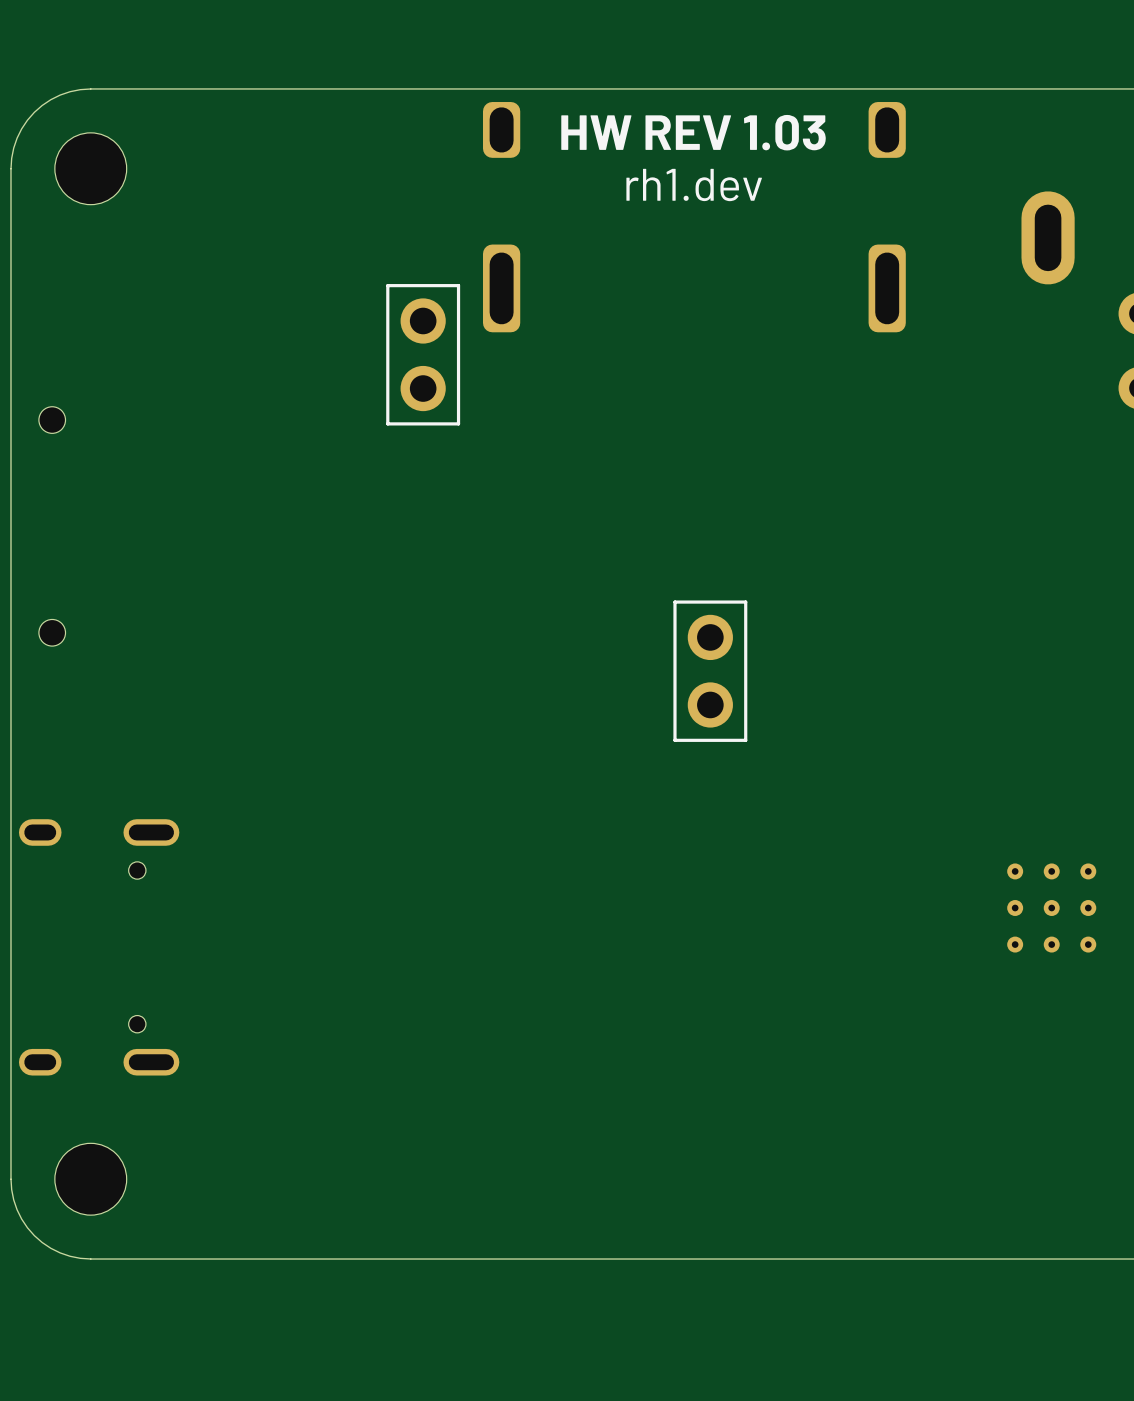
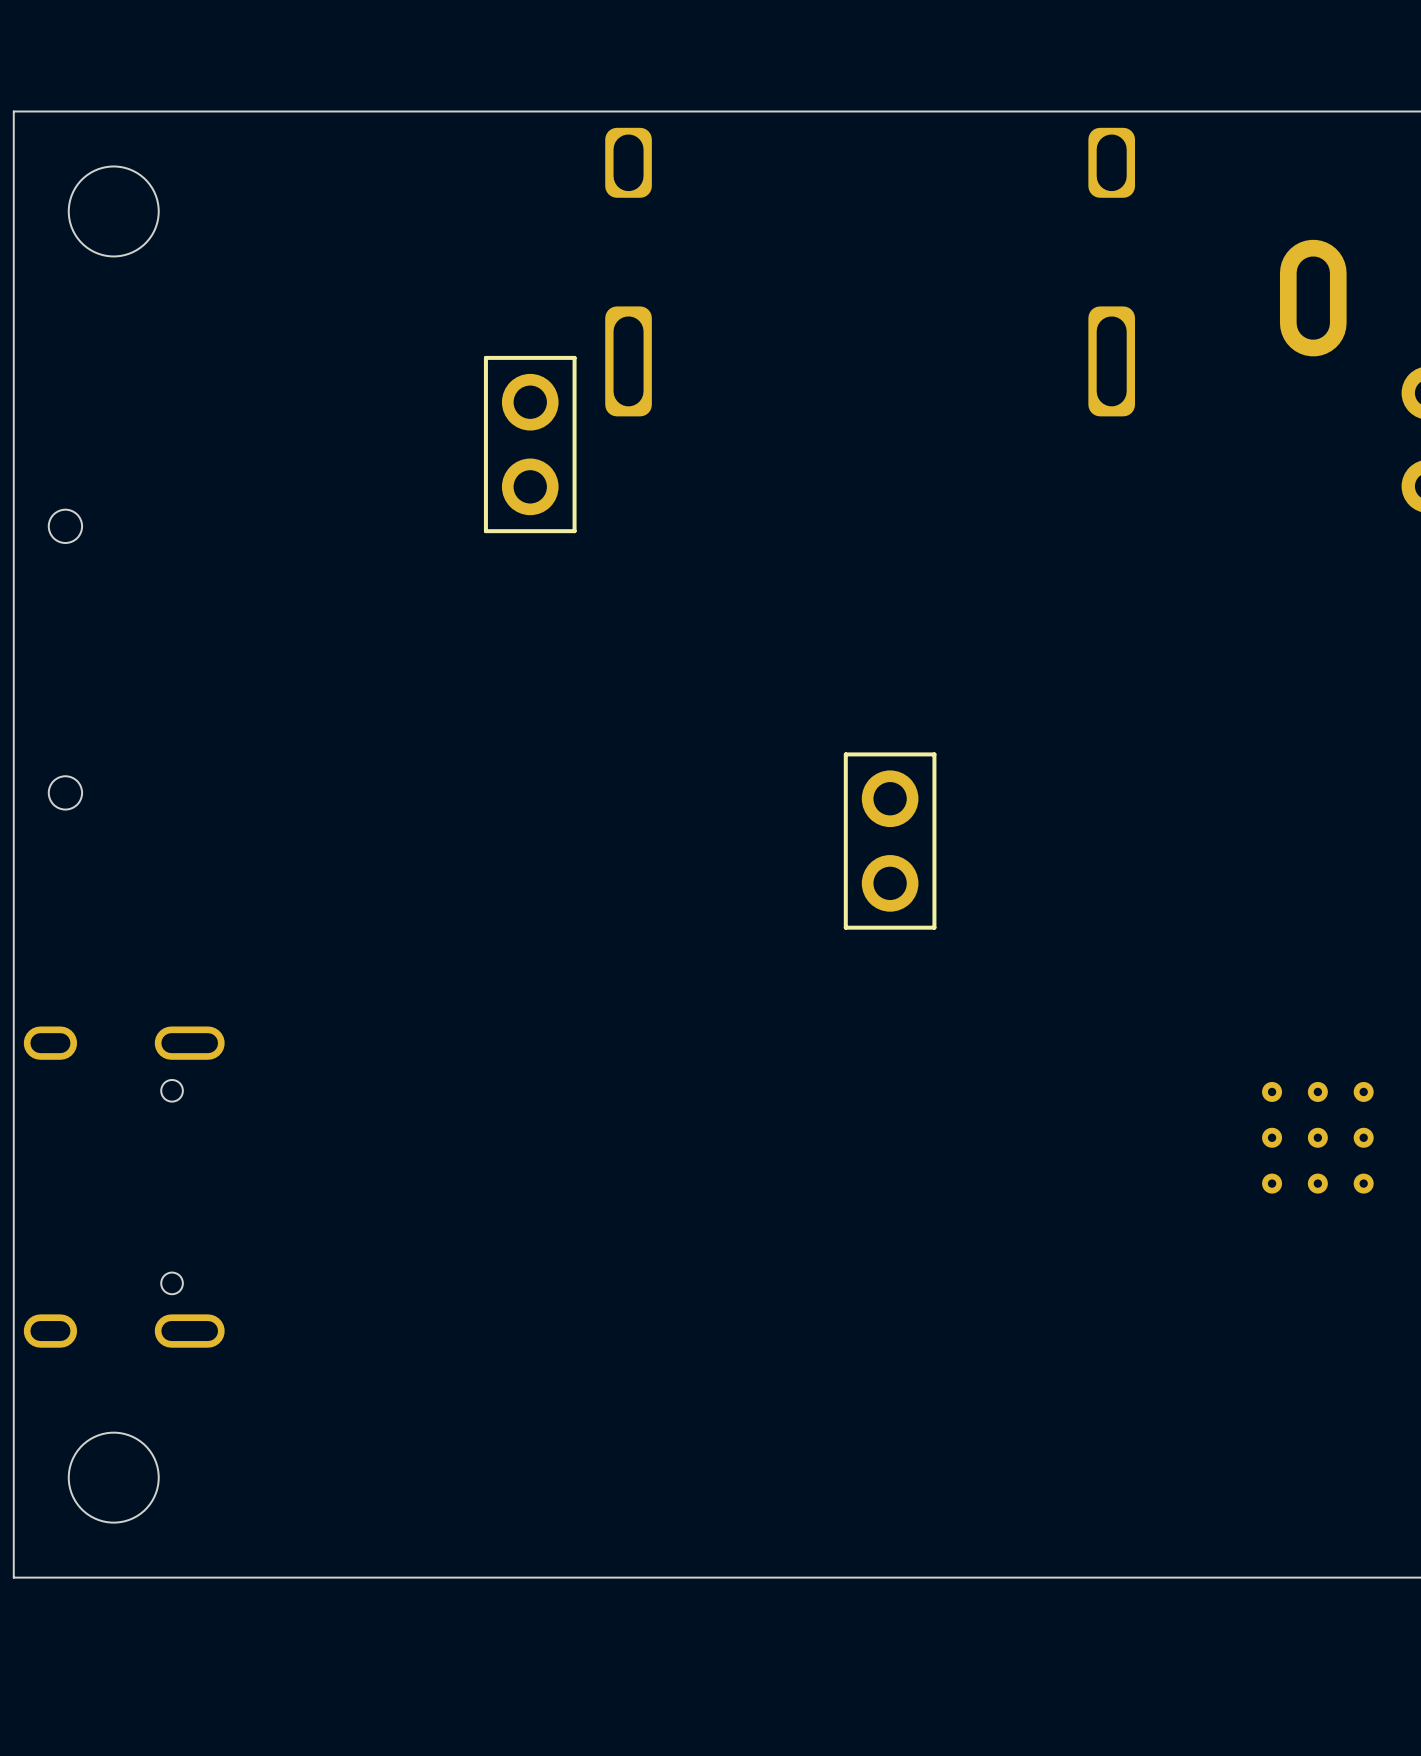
board edge: (90, 88) (60, 95) (34, 112) (17, 138) (10, 168) -> (113, 111) (13, 111) (13, 211)
text: HW REV 1.03 (693, 132) -> none
text: rh1.dev (694, 185) -> none
board edge: (10, 1179) (17, 1209) (34, 1235) (60, 1252) (90, 1259) -> (13, 1477) (13, 1577) (113, 1577)

